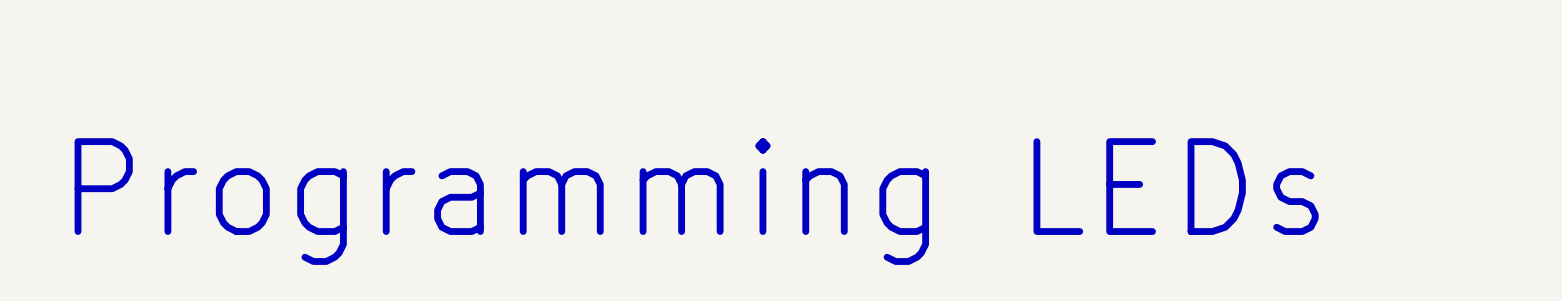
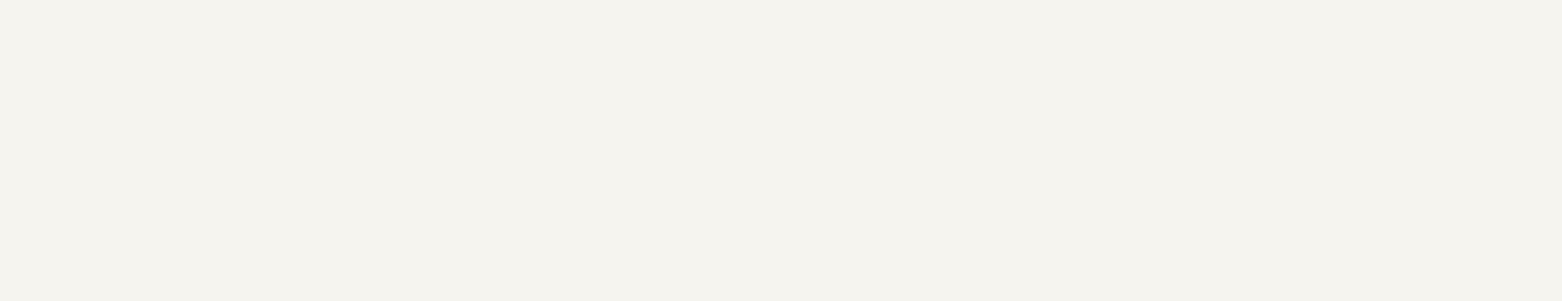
text: Programming LEDs (696, 201) -> none

